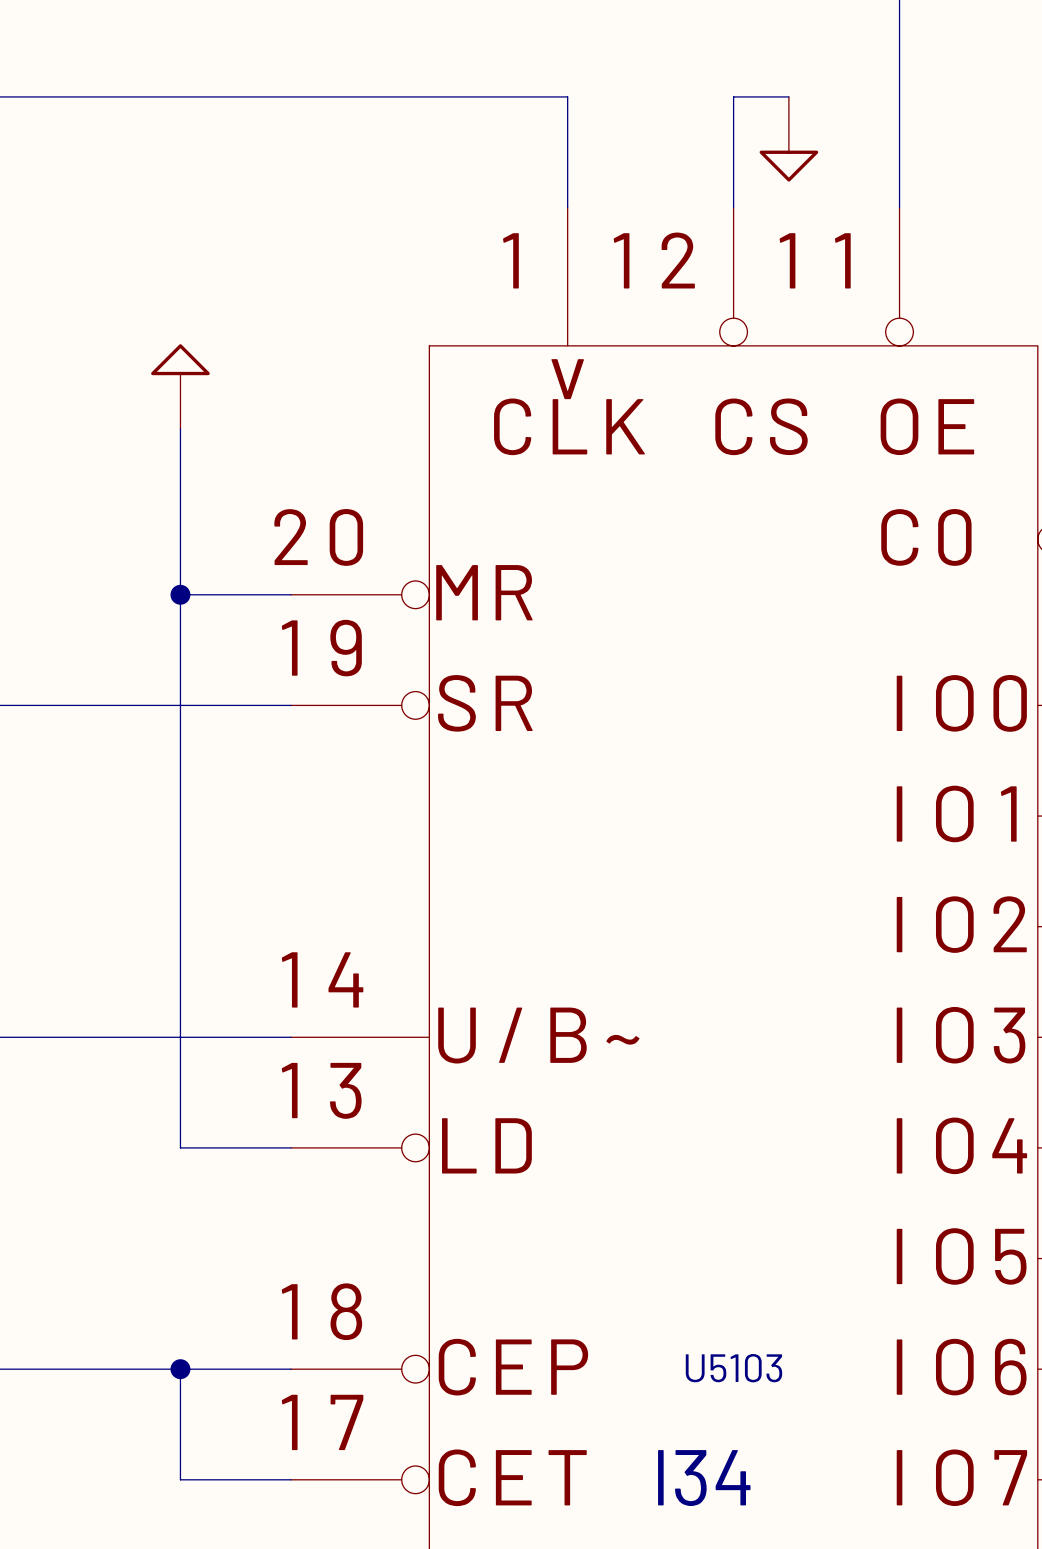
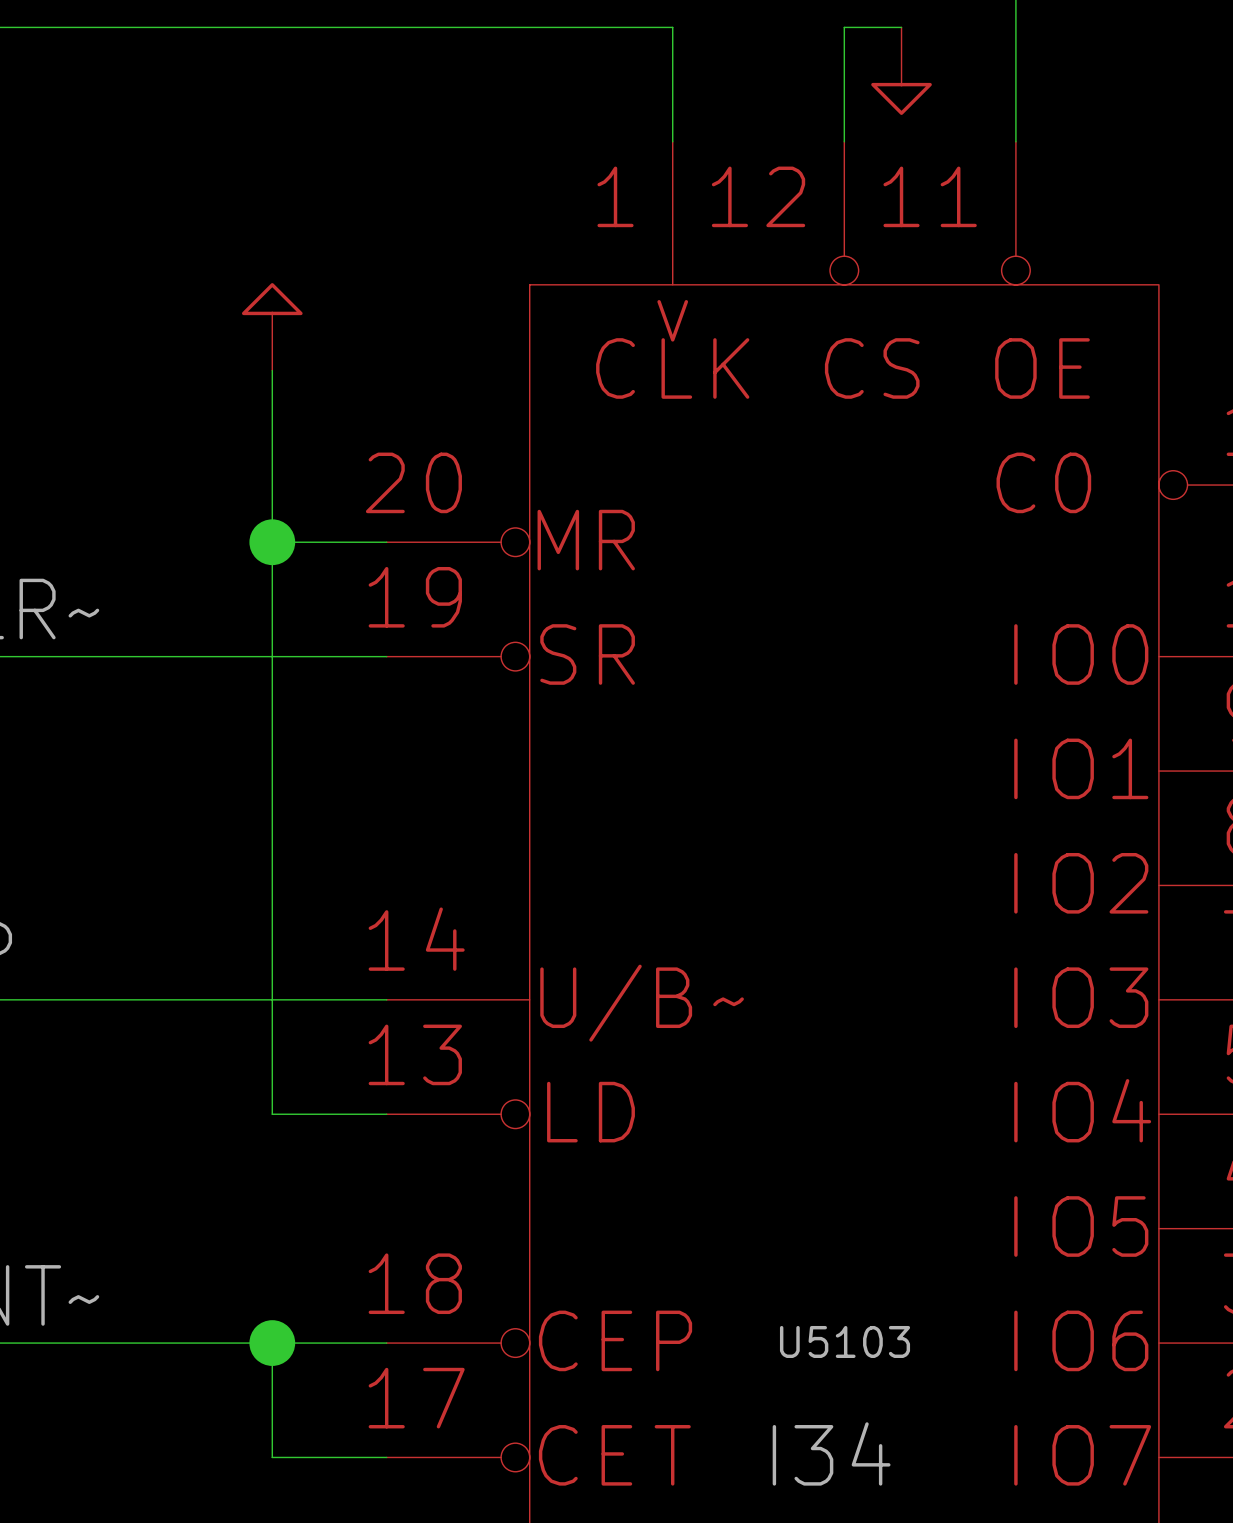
junction size: [170, 584, 191, 605] -> [249, 519, 296, 566]
junction size: [170, 1359, 191, 1380] -> [249, 1320, 296, 1366]

